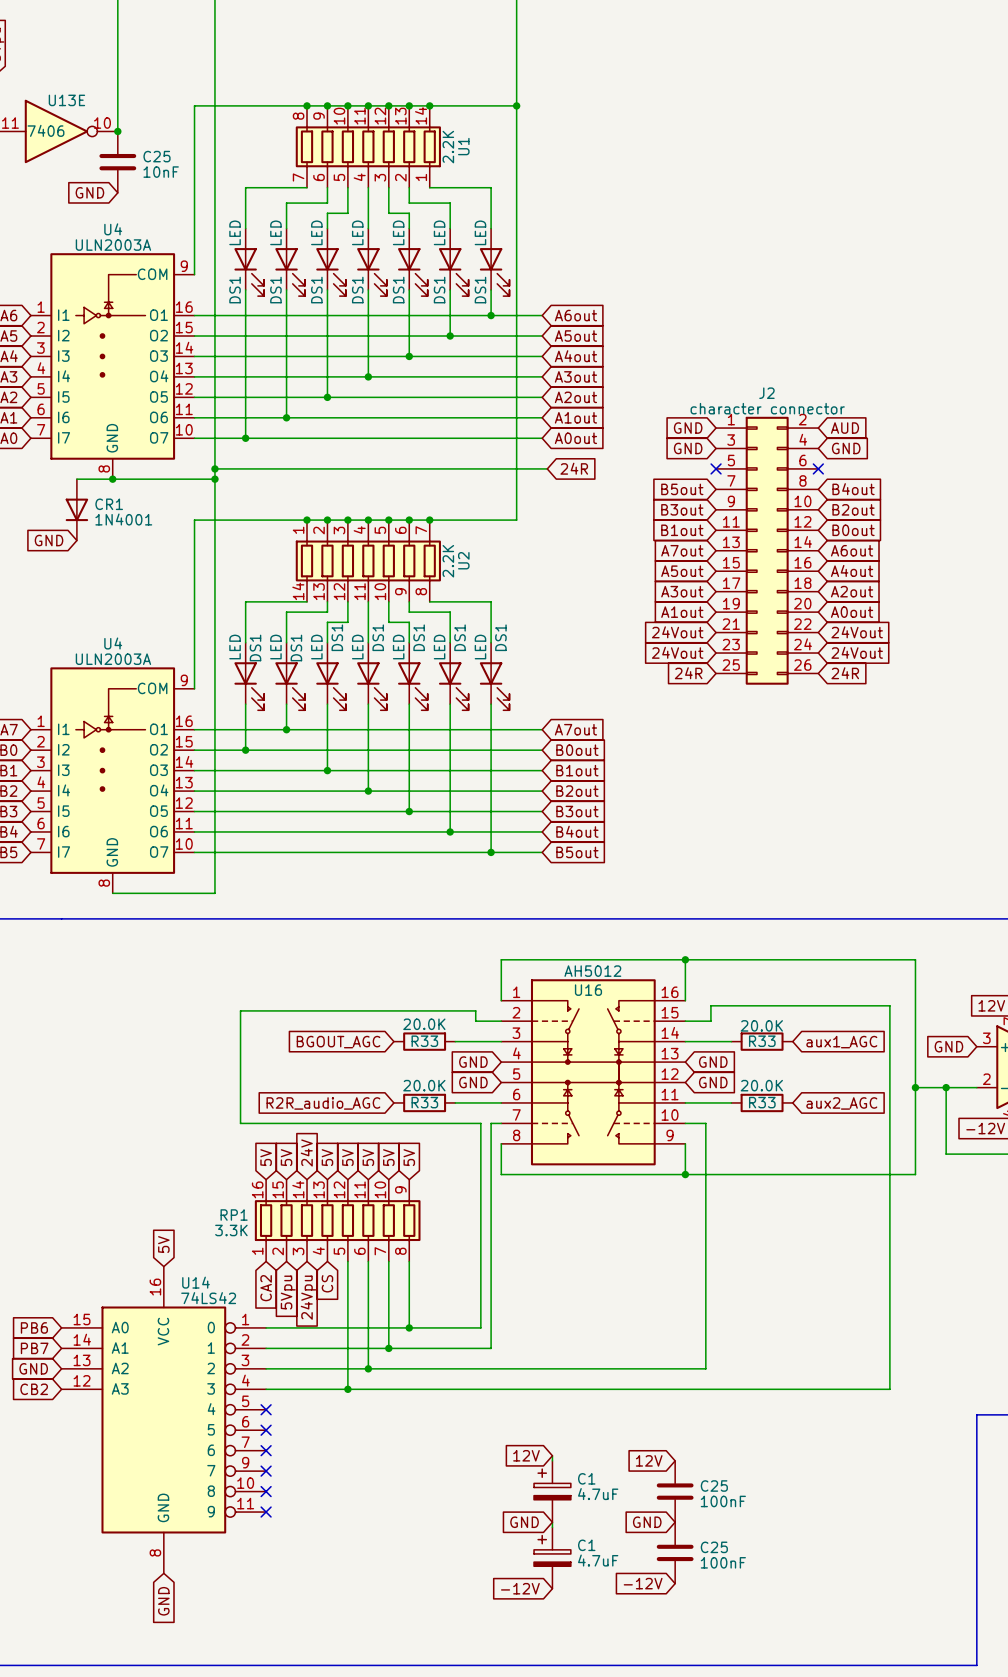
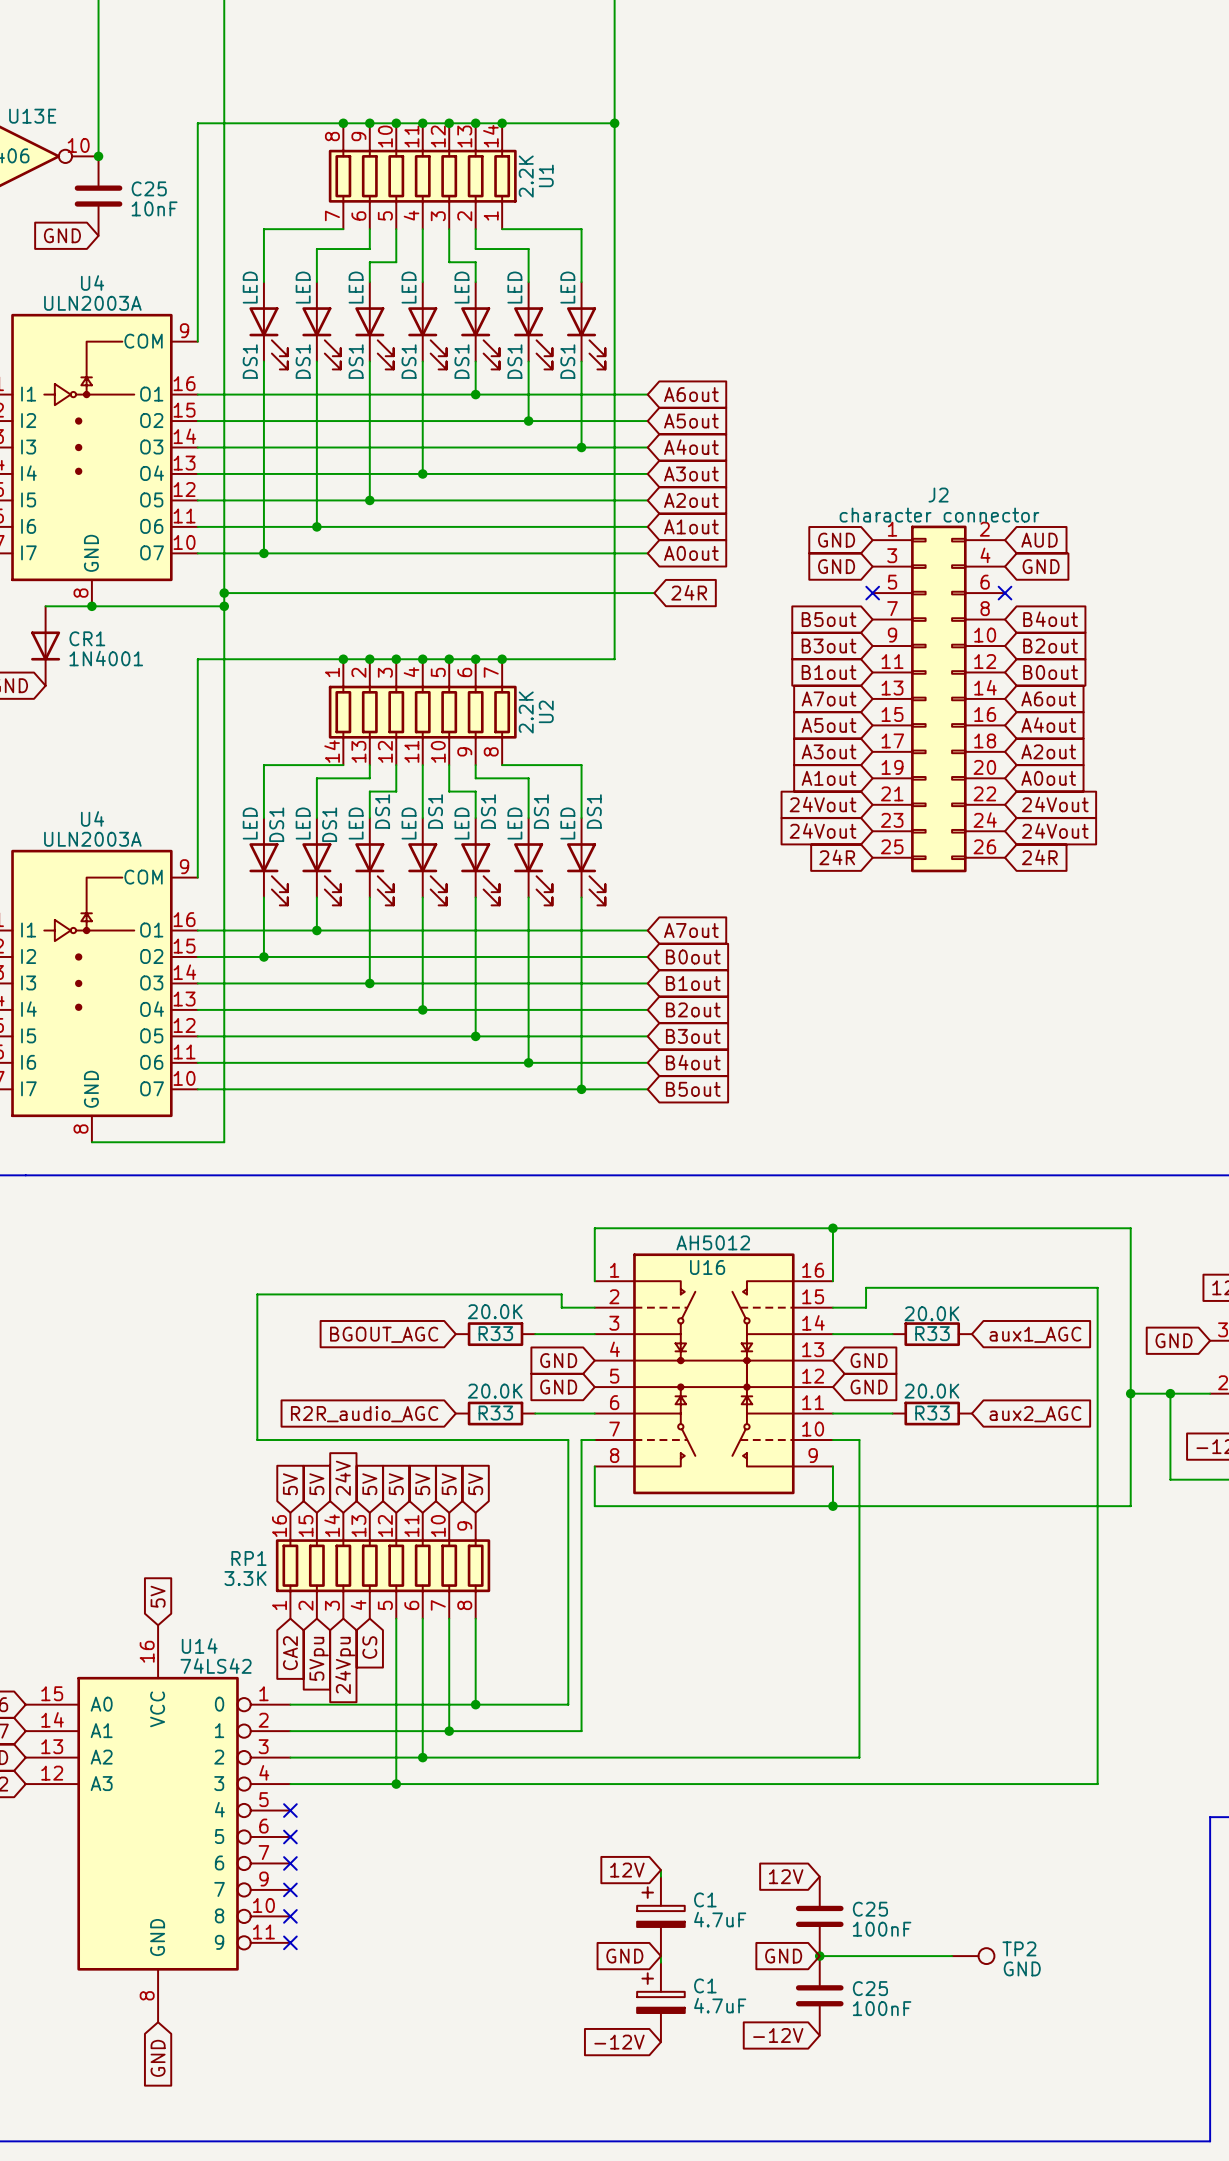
wire: (409, 315) (409, 356) -> (581, 394) (581, 447)
junction: none -> (475, 394)
junction: (491, 315) -> none
junction: (409, 356) -> none
junction: none -> (581, 447)
wire: none -> (819, 1956) (952, 1956)
junction: none -> (819, 1956)
TP2: none -> GND (973, 1956)

